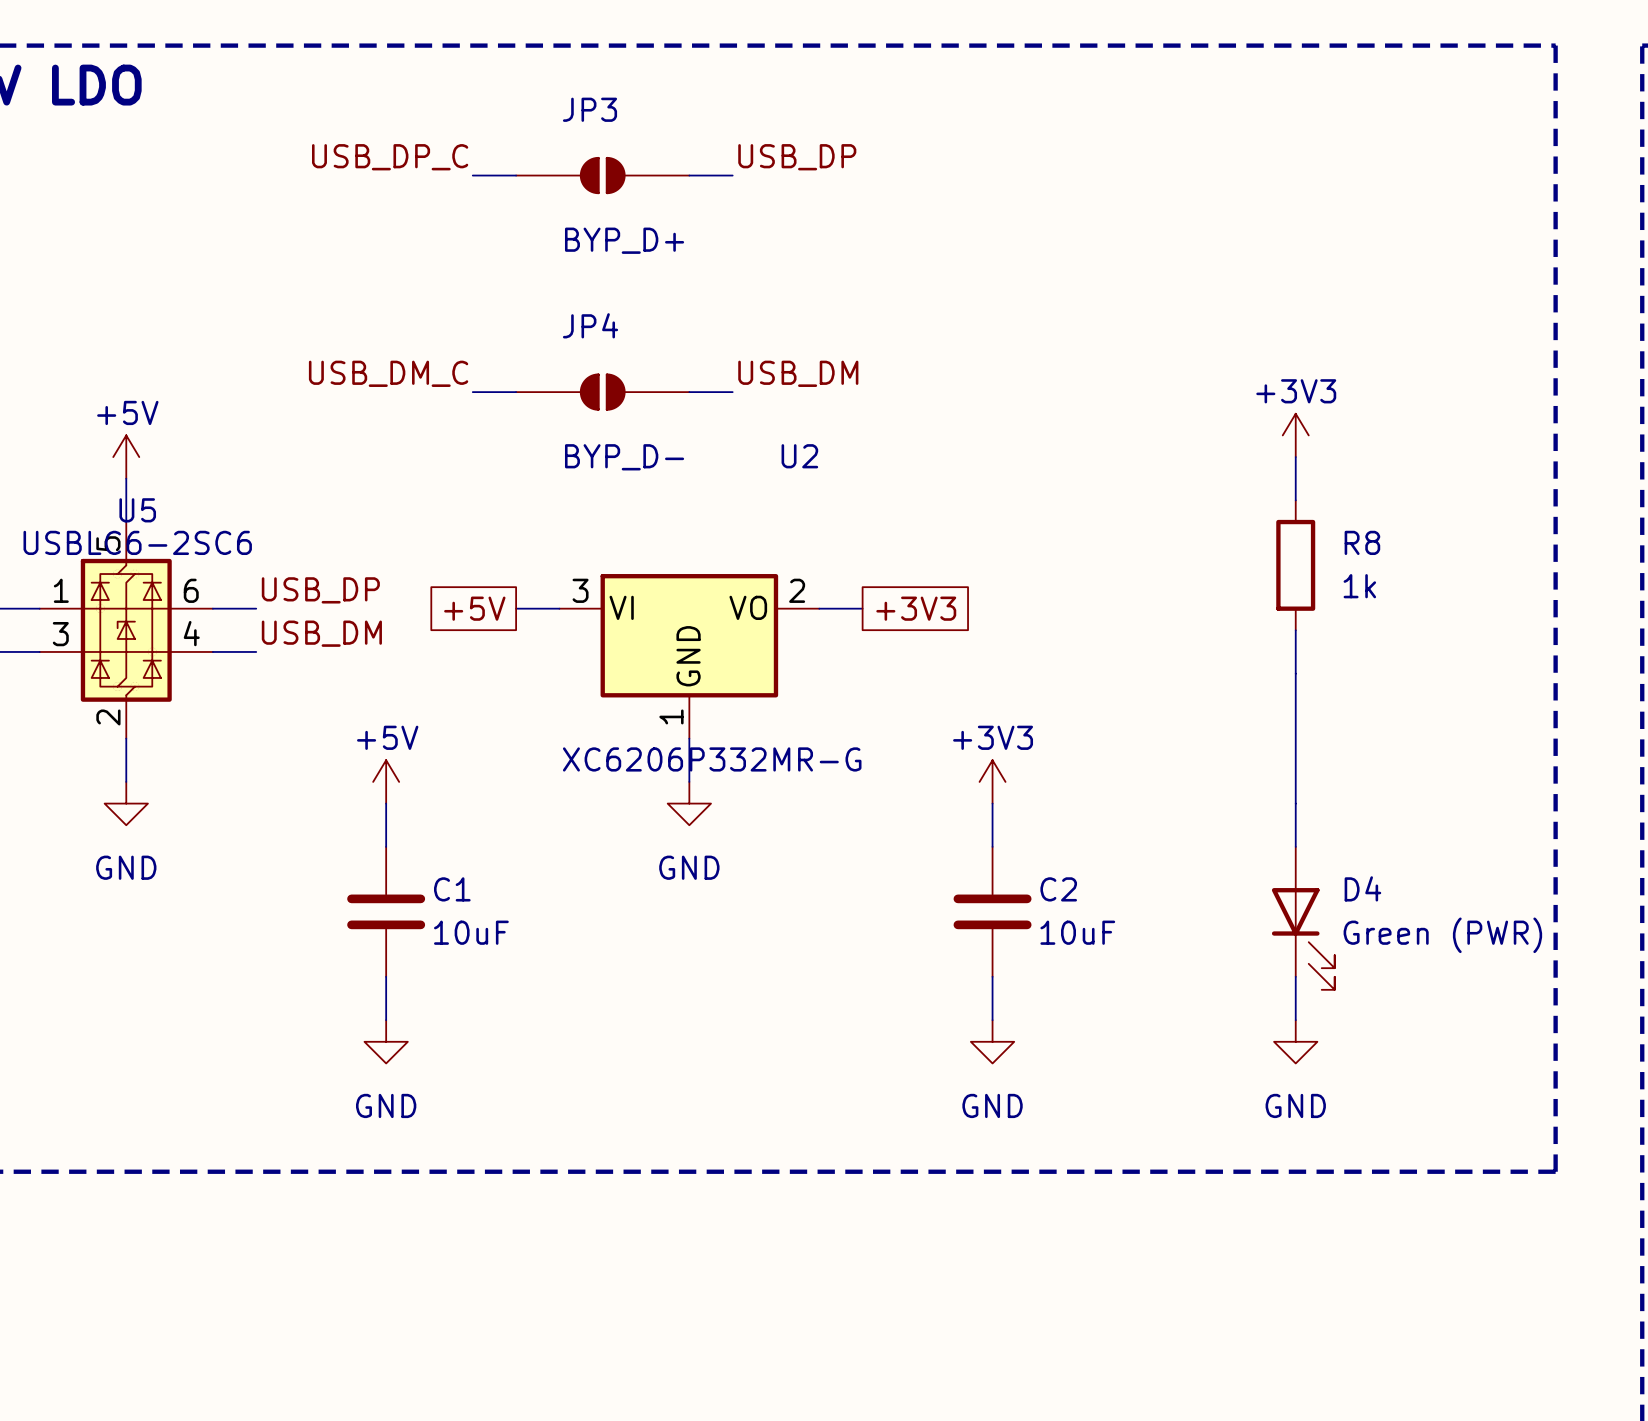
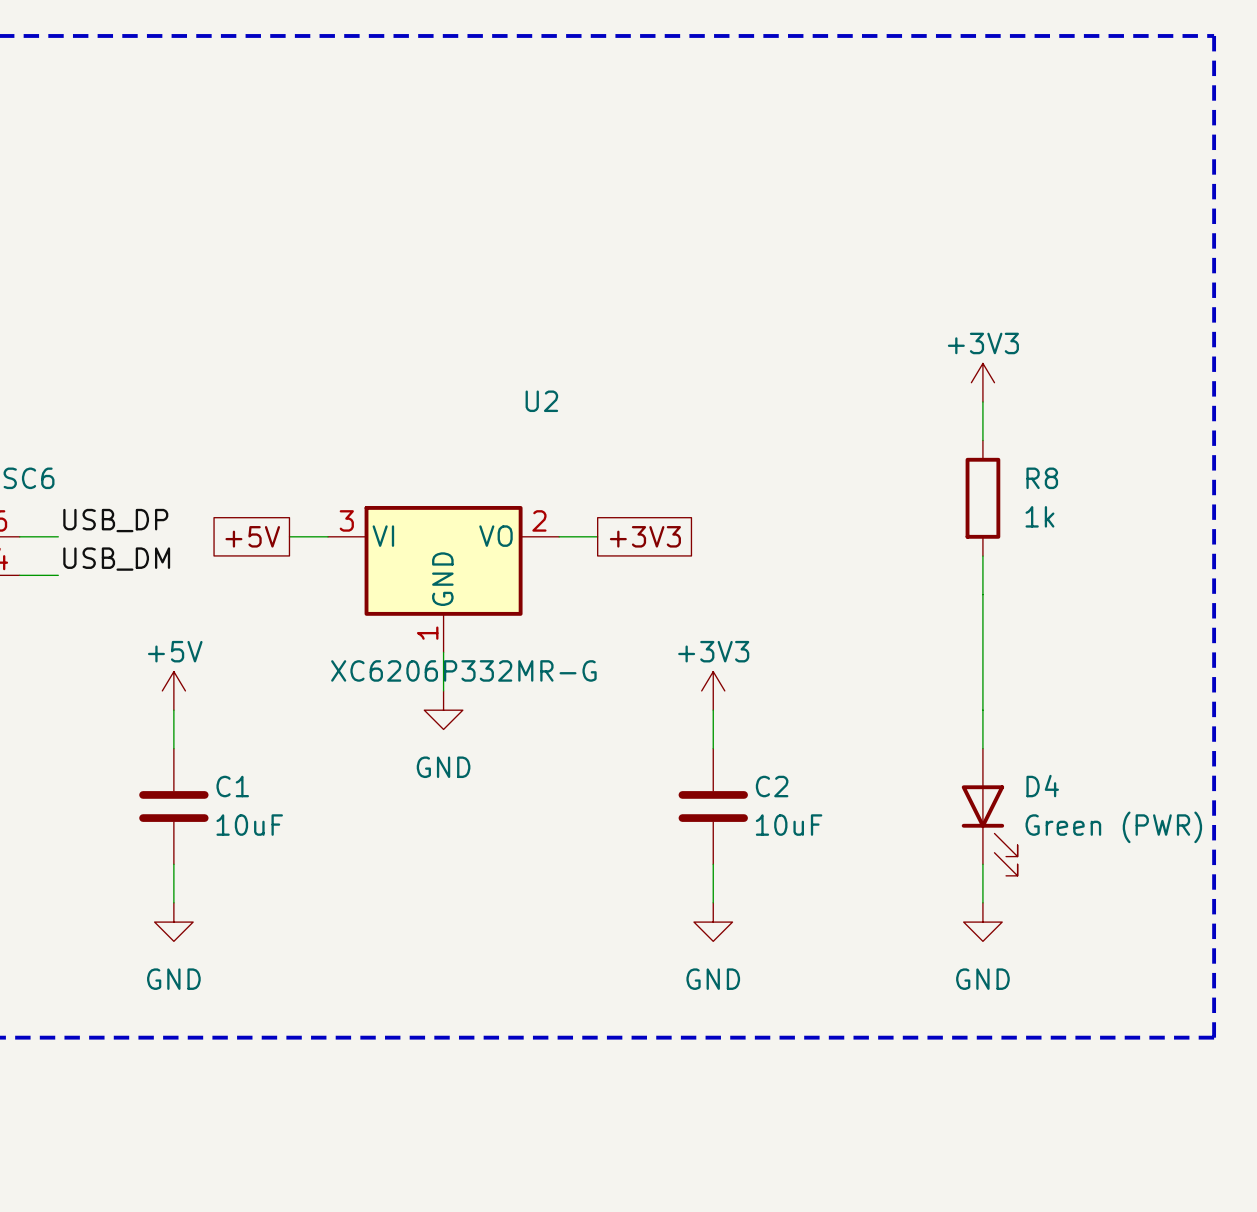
label: USB_DP_C (390, 157) -> none
label: USB_DP (797, 157) -> none
wire: (472, 175) (516, 175) -> none
JP3: BYP_D+ (602, 175) -> none
wire: (689, 175) (732, 175) -> none
label: USB_DM_C (388, 373) -> none
label: USB_DM (798, 373) -> none
wire: (472, 392) (516, 392) -> none
JP4: BYP_D- (602, 392) -> none
wire: (689, 392) (732, 392) -> none

